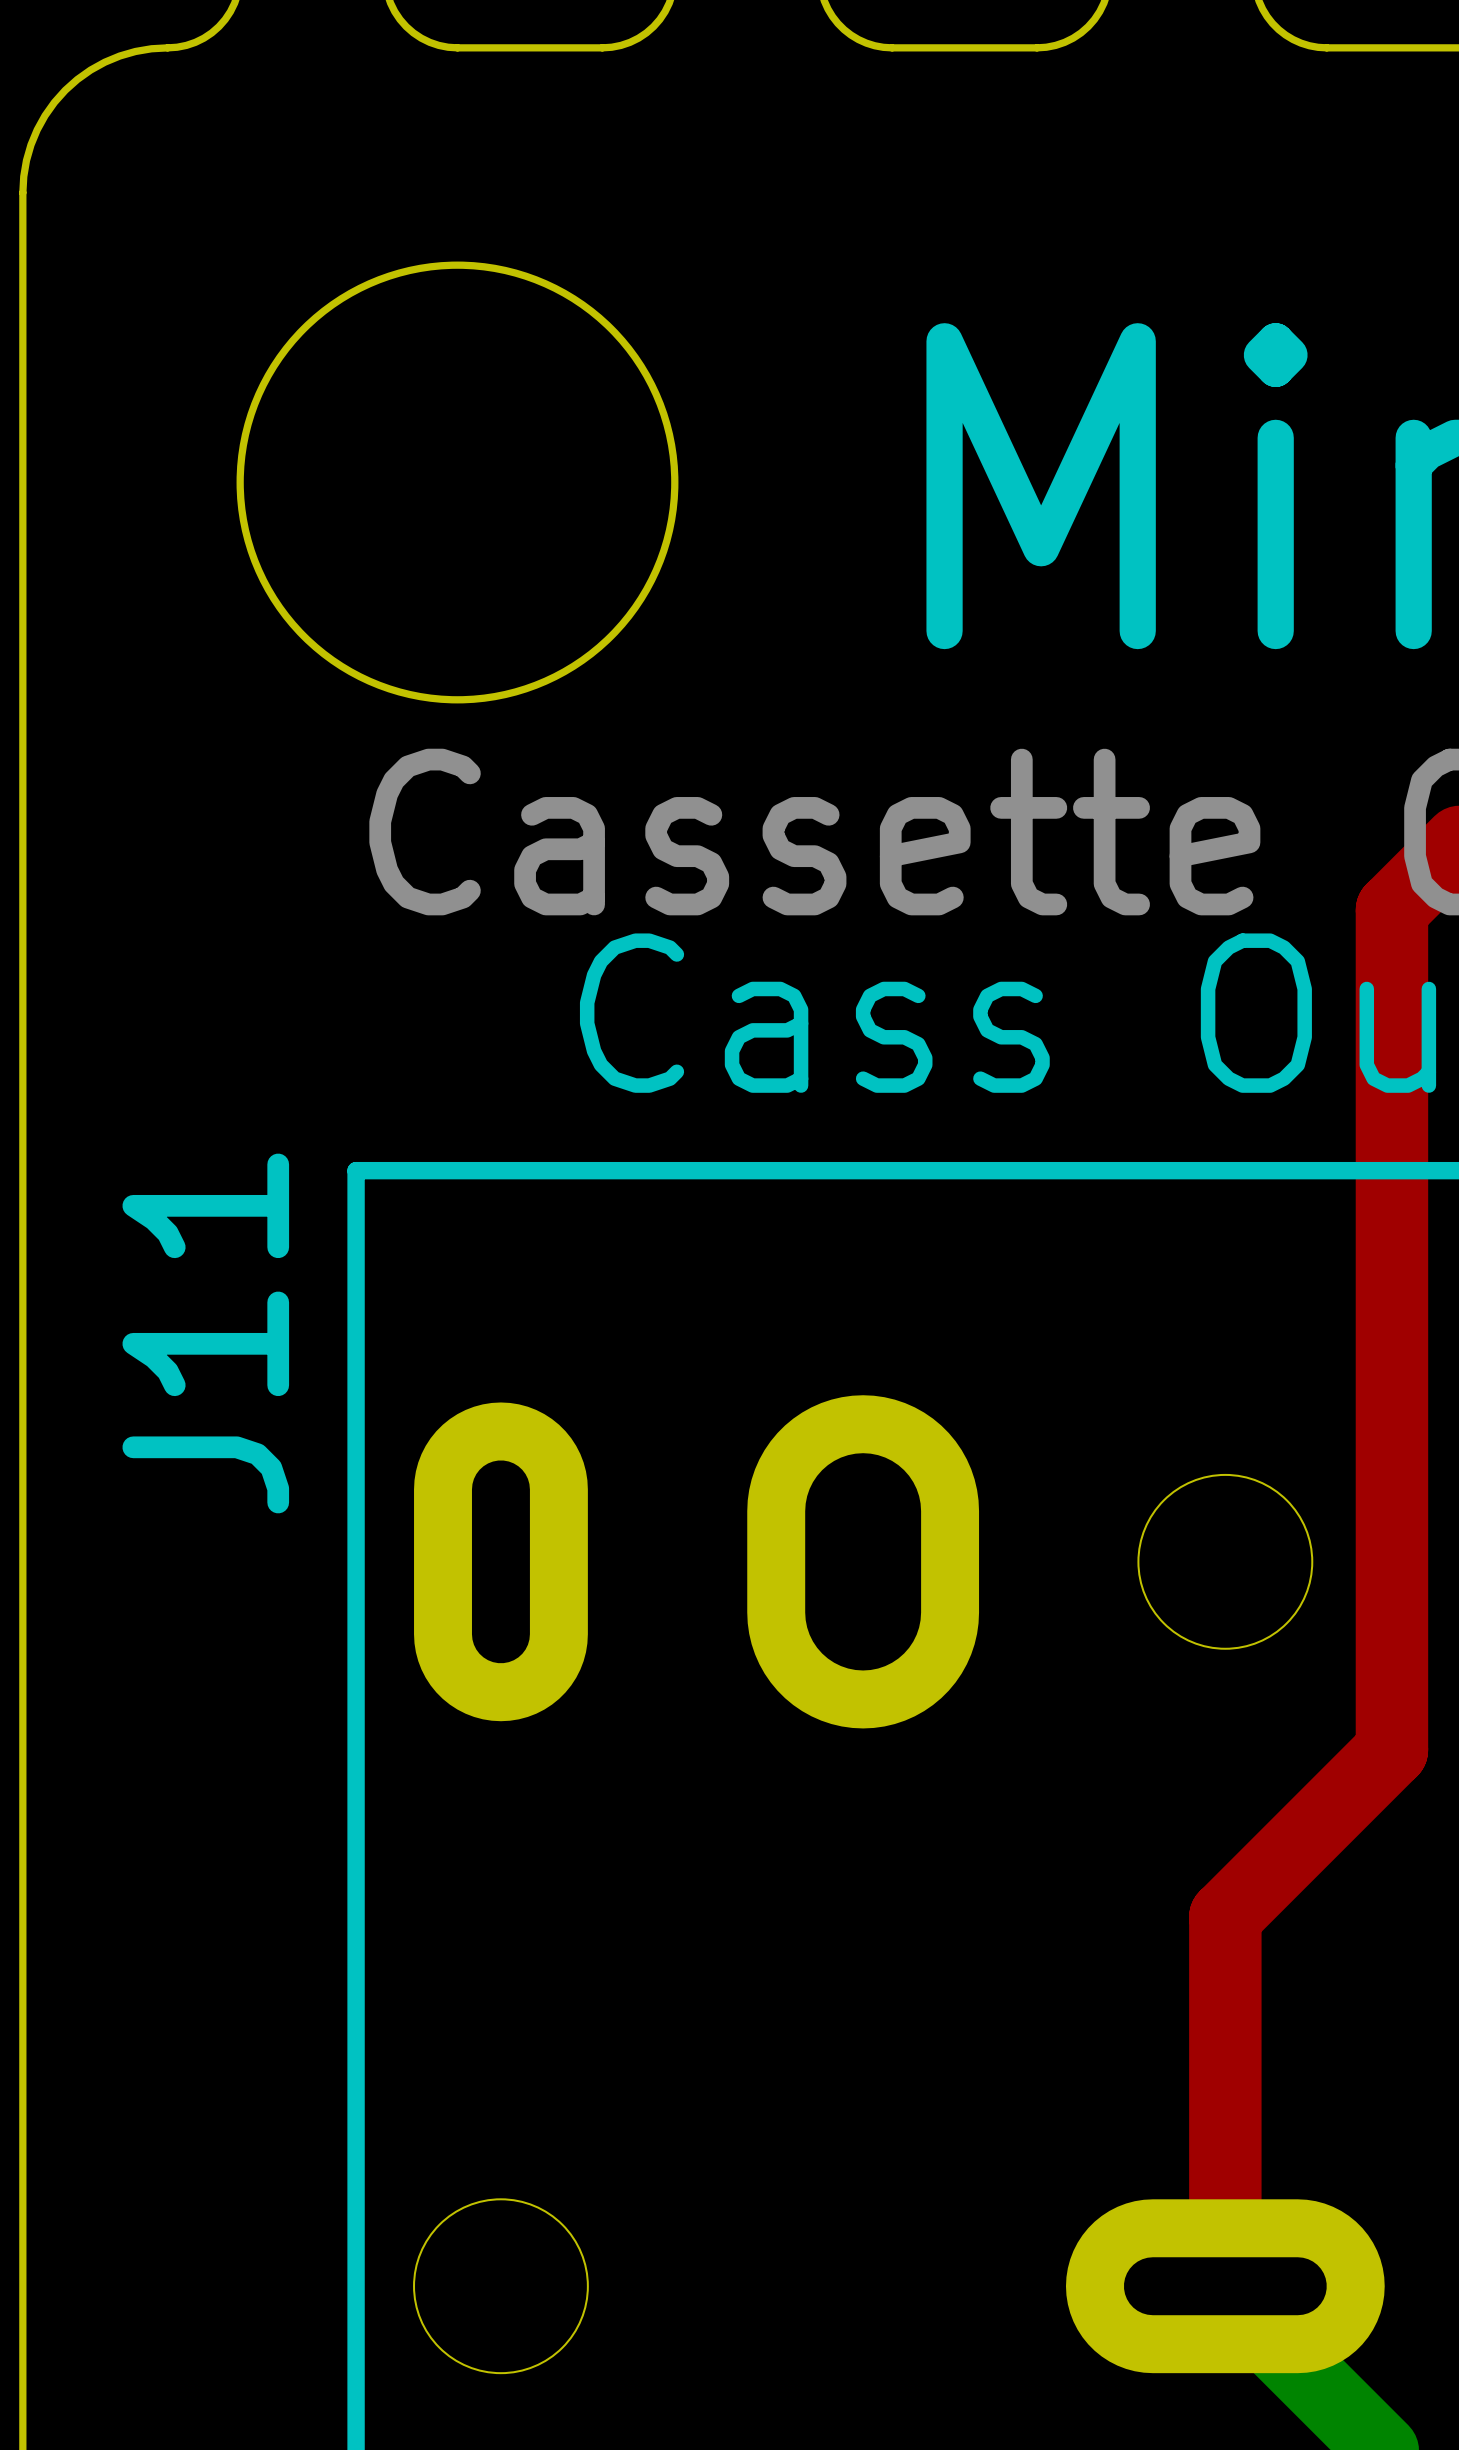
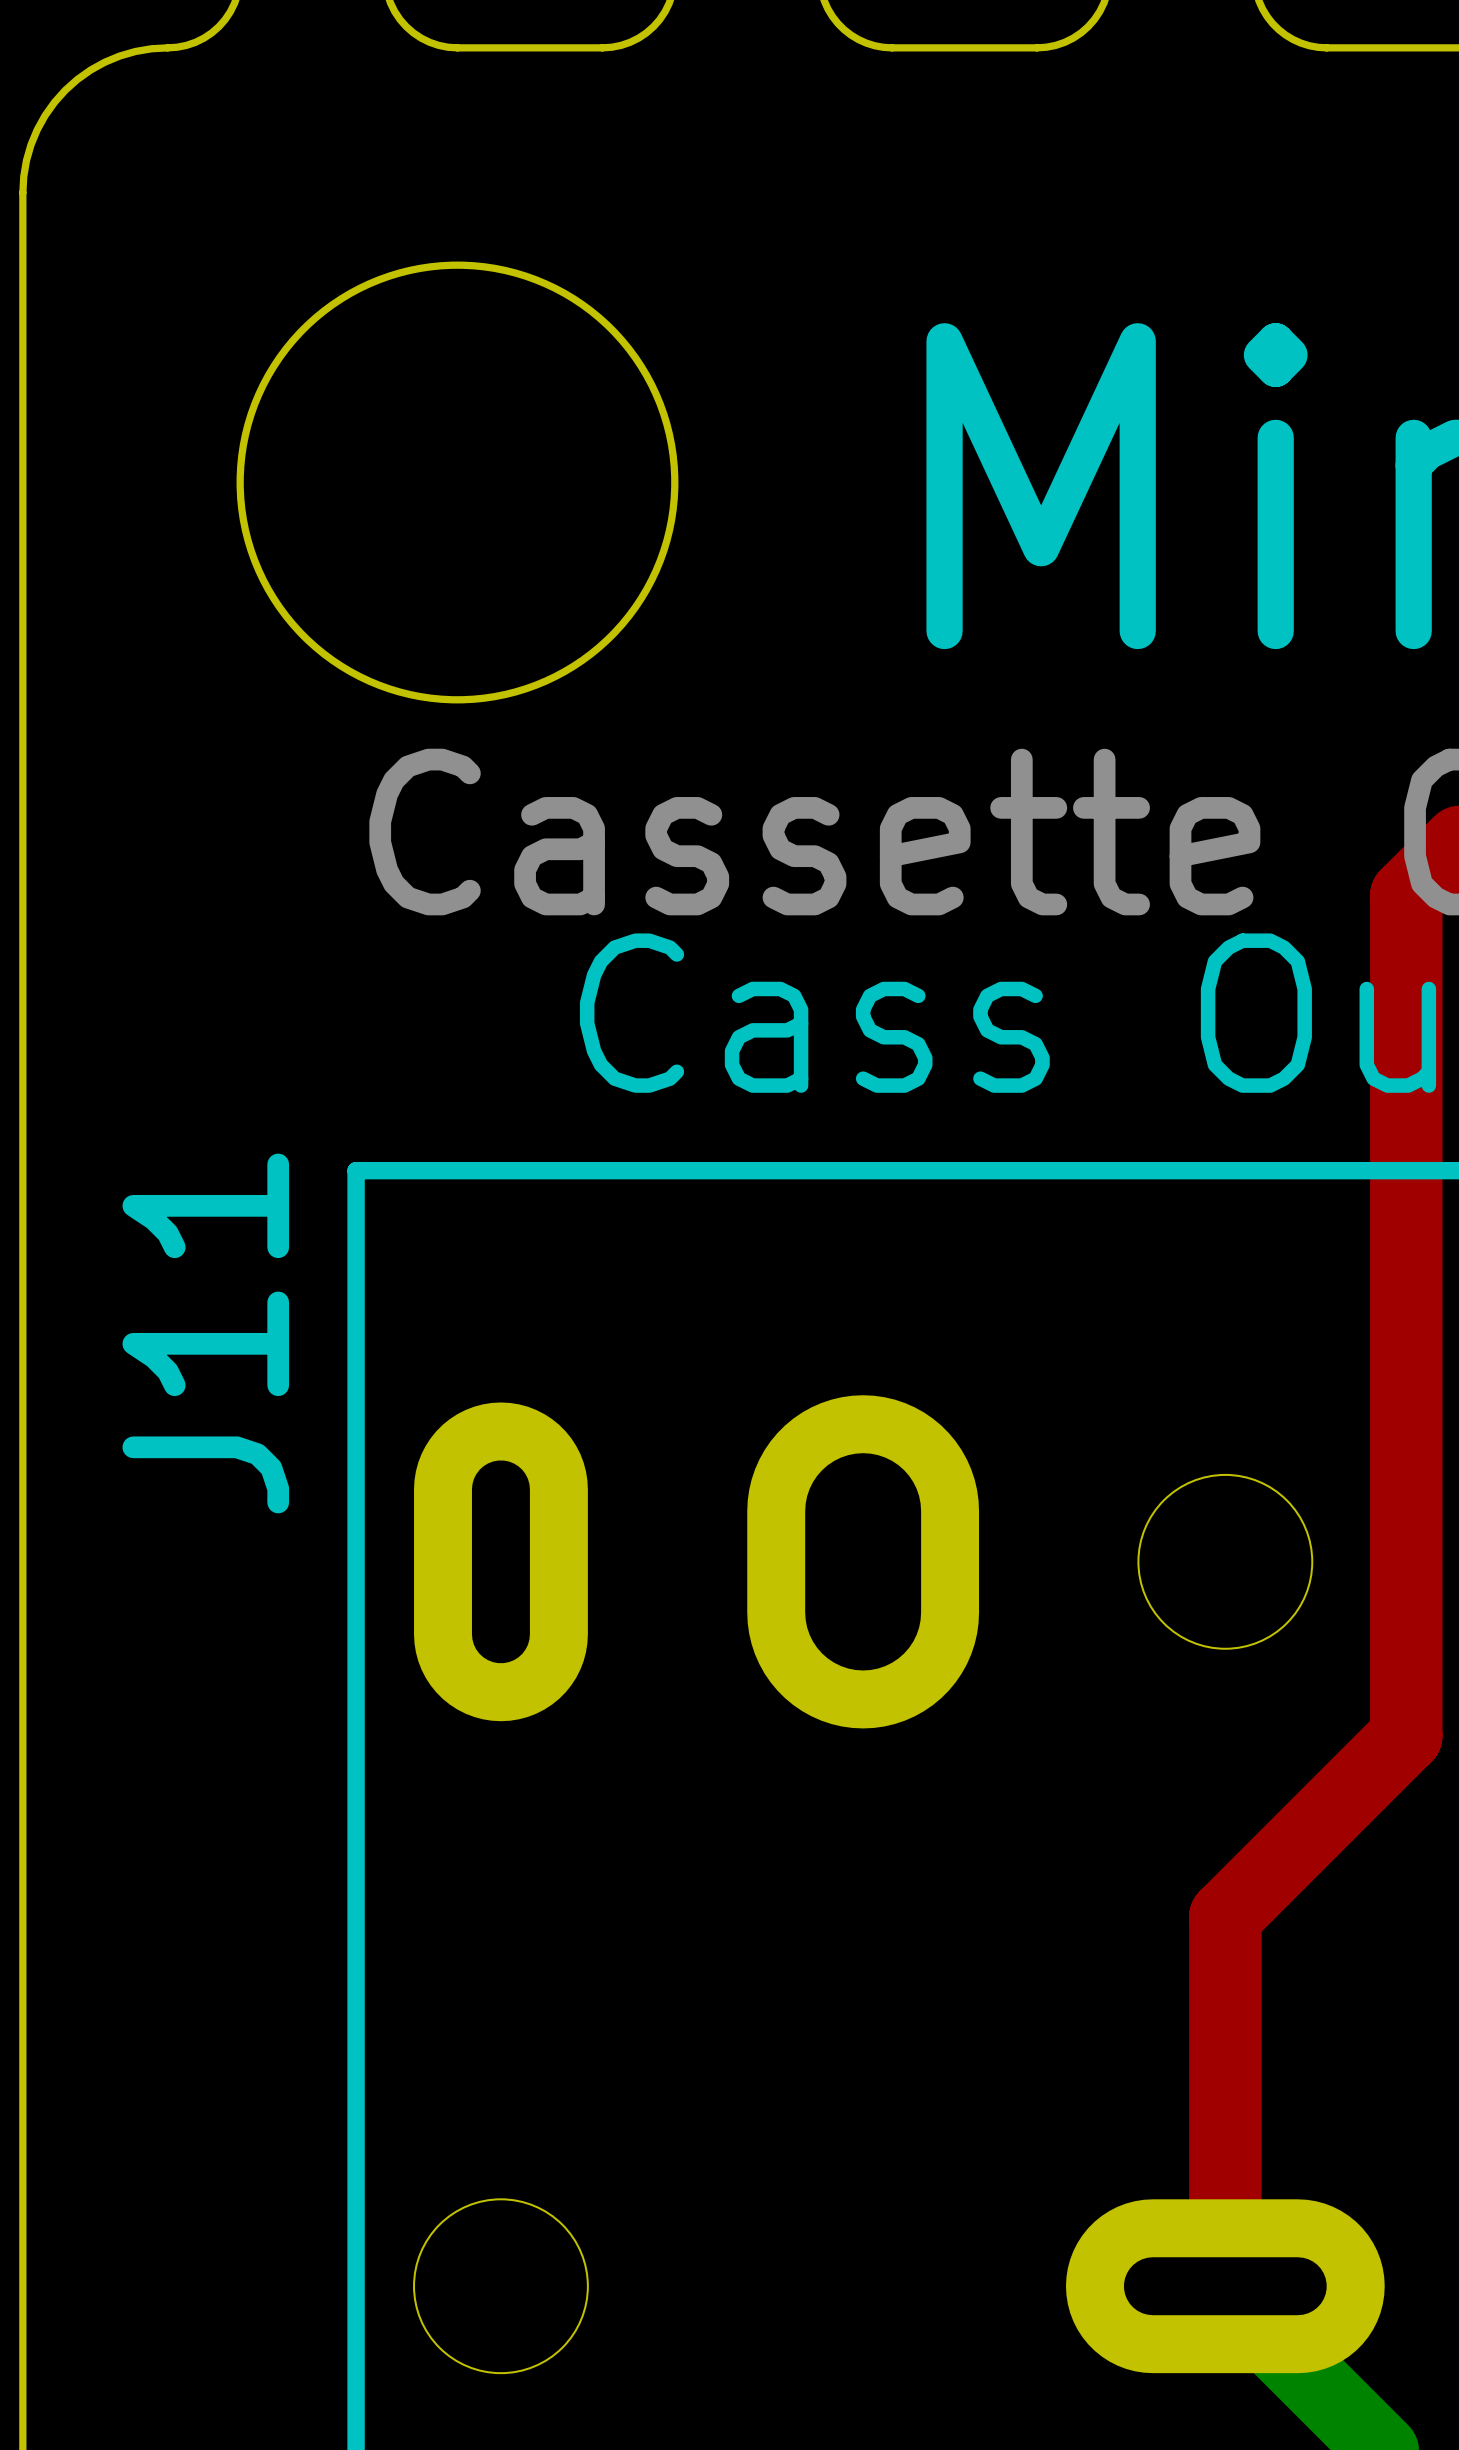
top track: (1406, 895) (1391, 909) (1391, 1750) -> (1406, 895) (1406, 1735) (1391, 1750)

